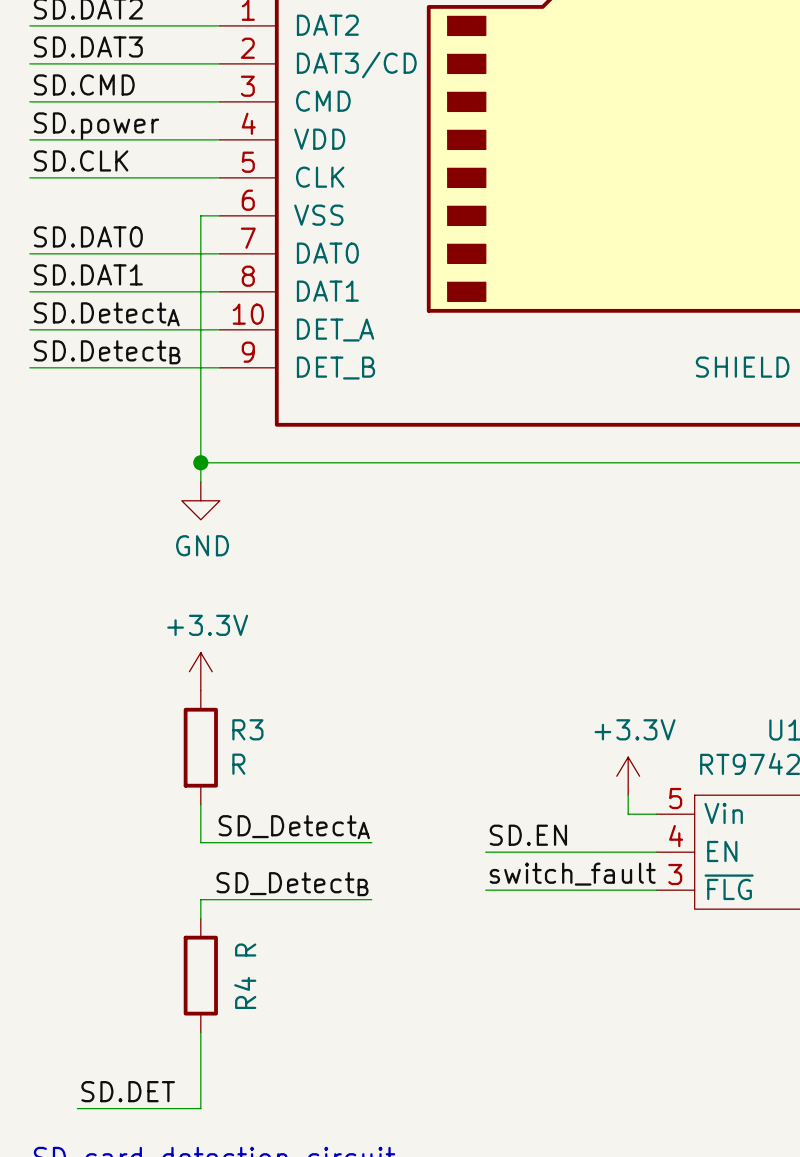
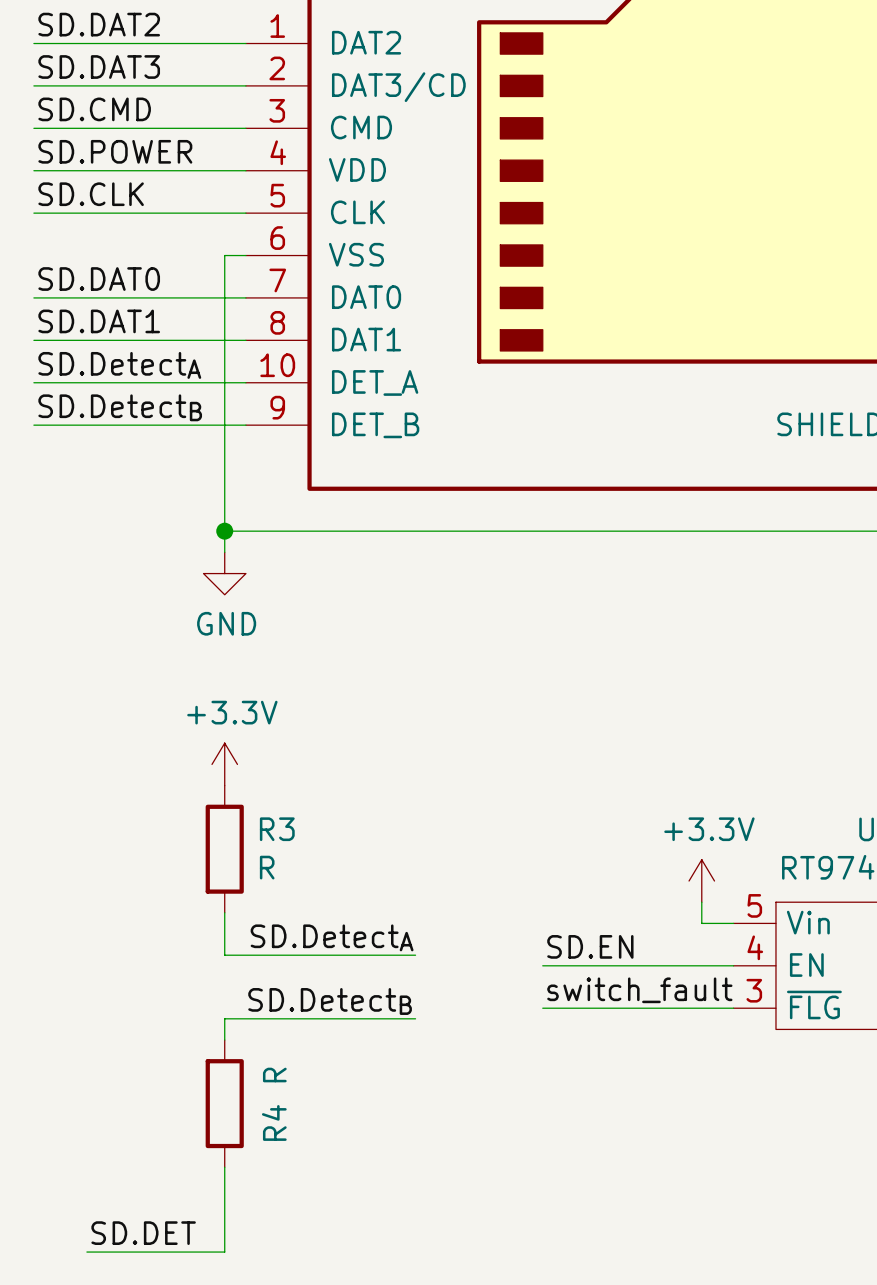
label: SD.power (96, 126) -> SD.POWER (115, 151)
label: SD_DetectA (294, 827) -> SD.DetectA (332, 937)
label: SD_DetectB (292, 884) -> SD.DetectB (330, 1001)

